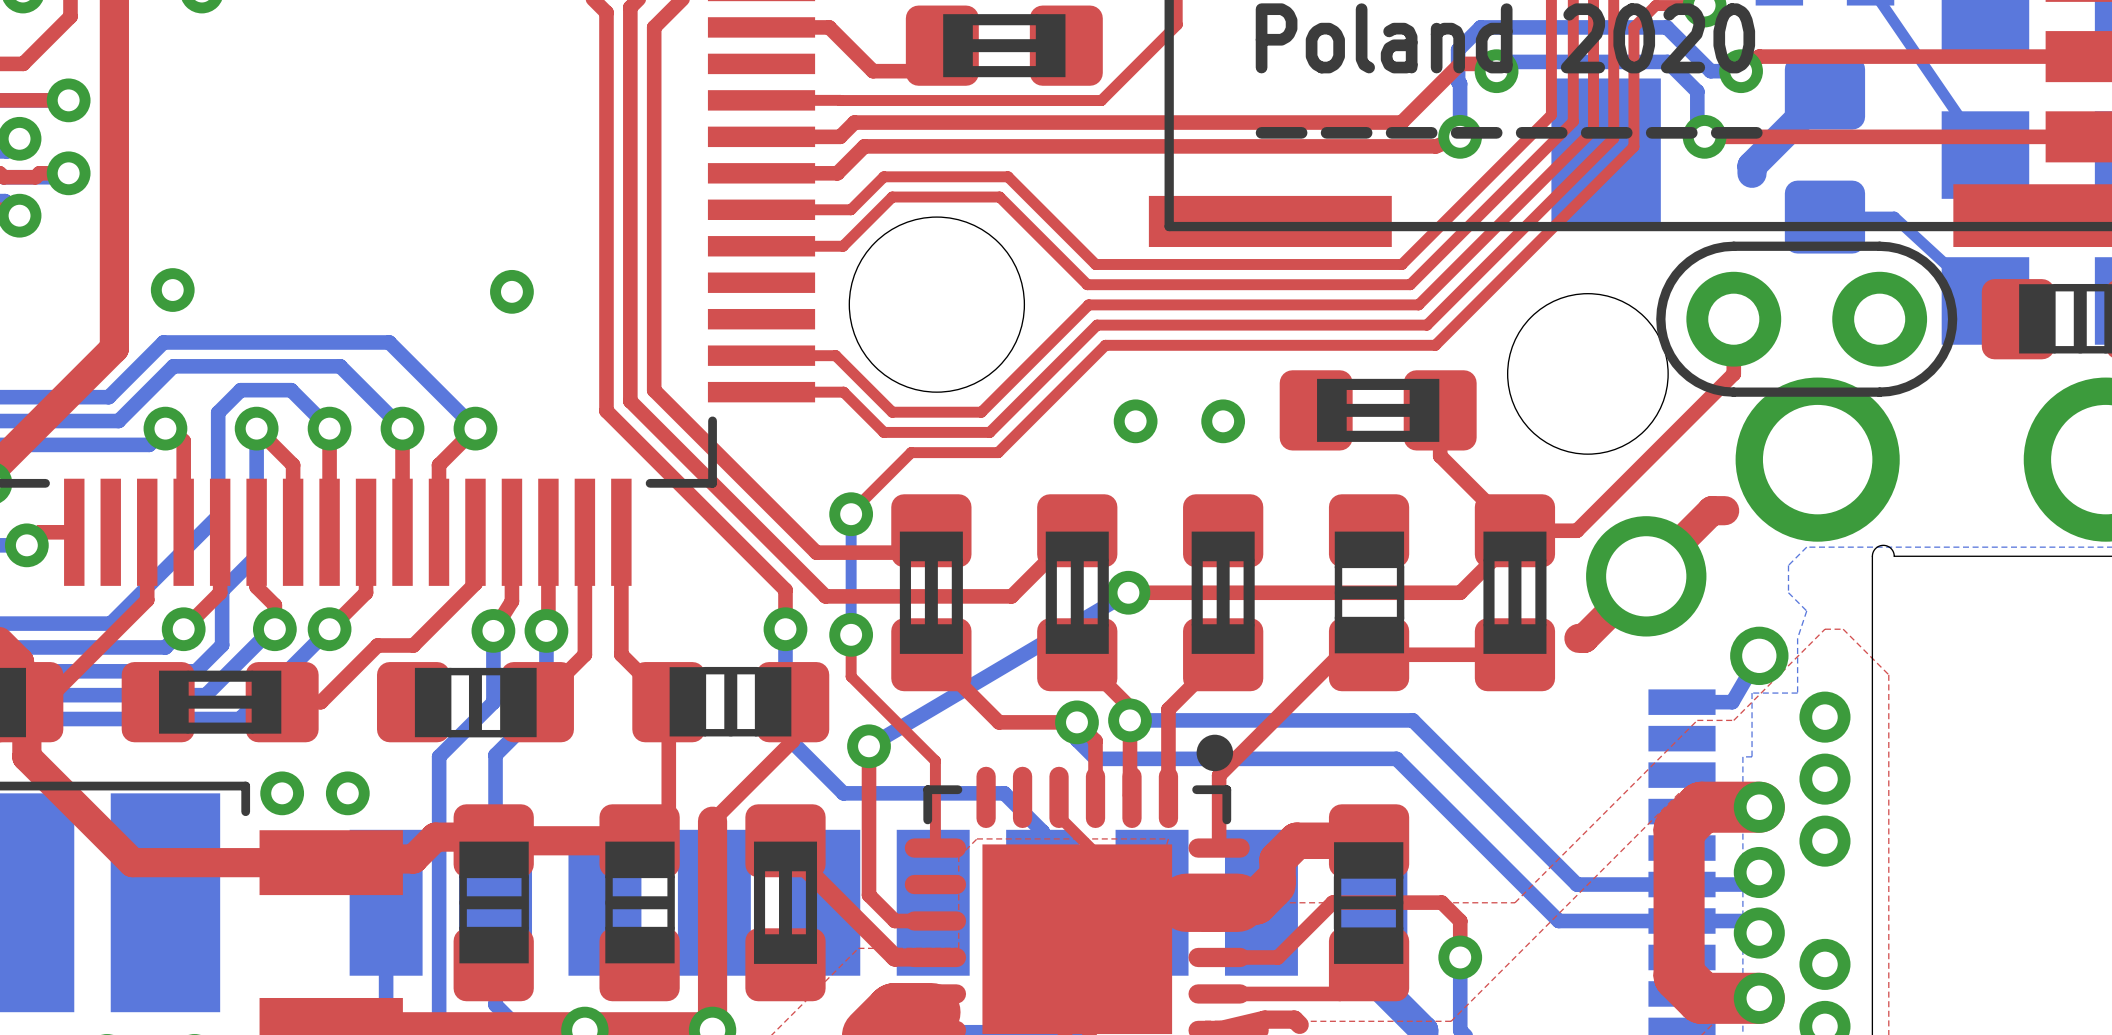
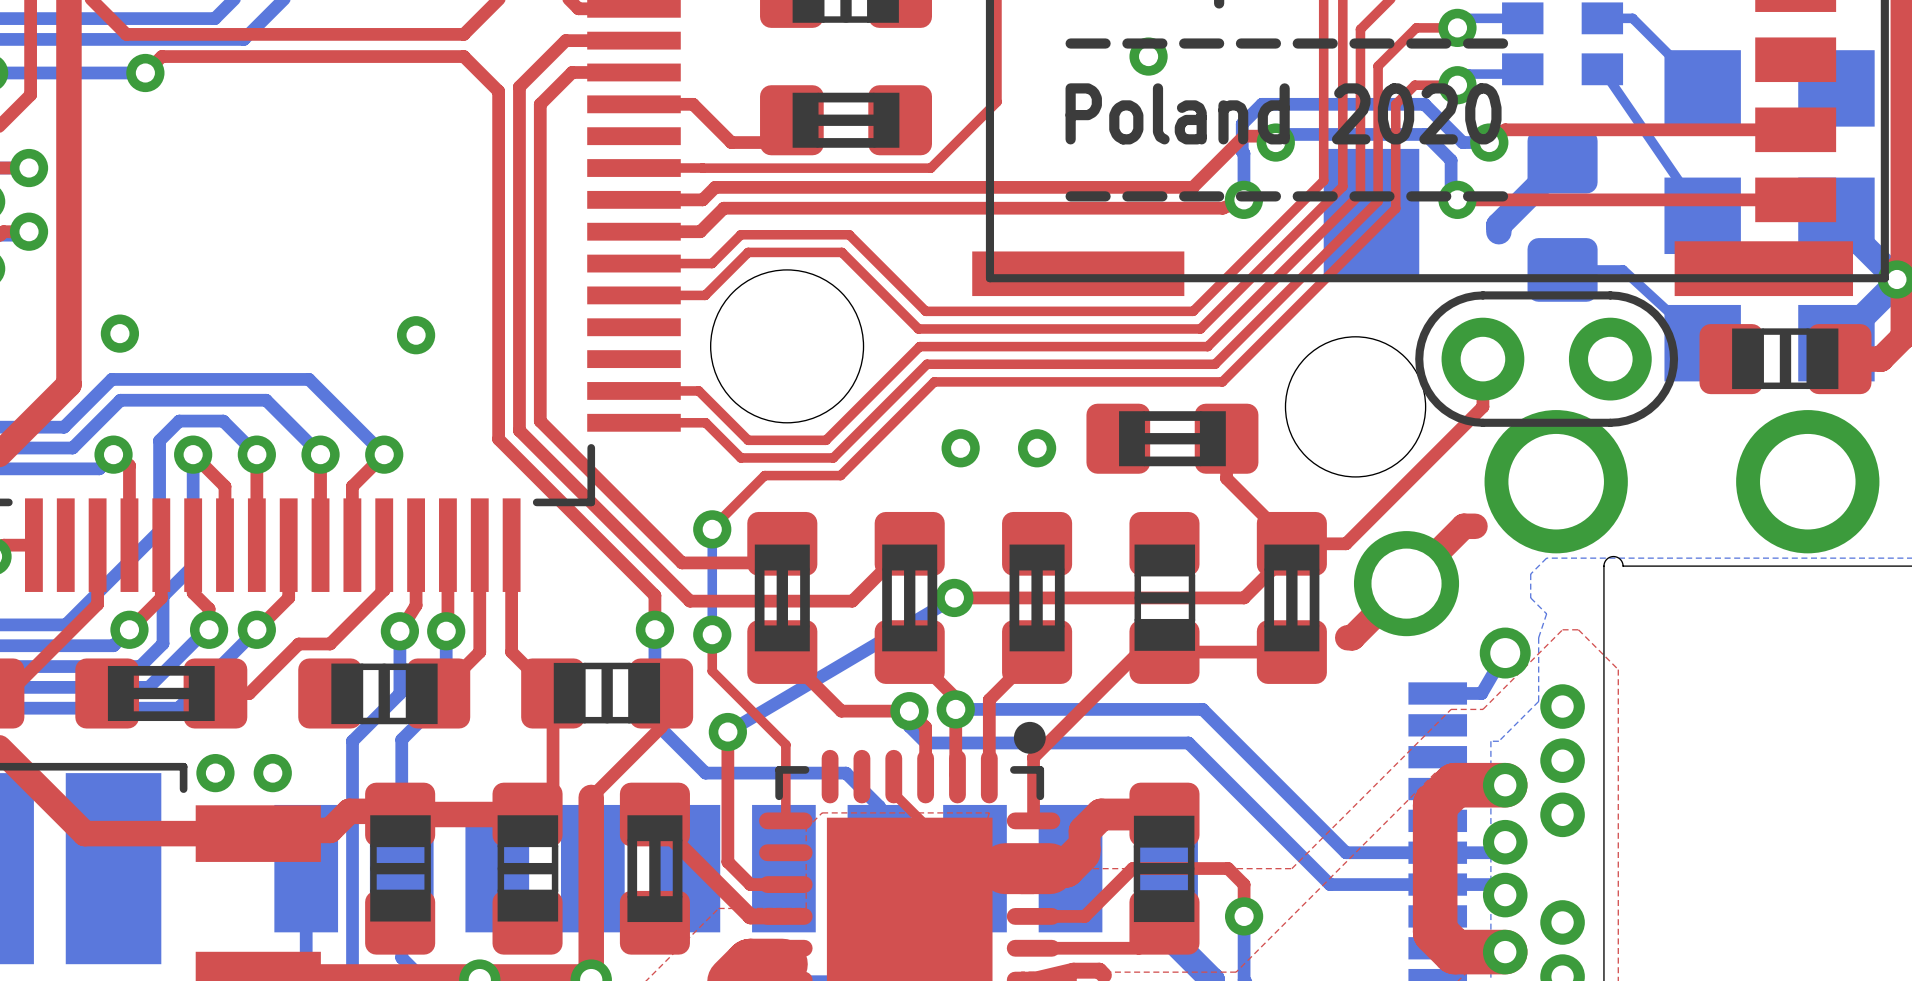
bottom zone outline: (1797, 693) (1752, 693) (1752, 756) -> (1538, 685) (1538, 701) (1498, 741)

